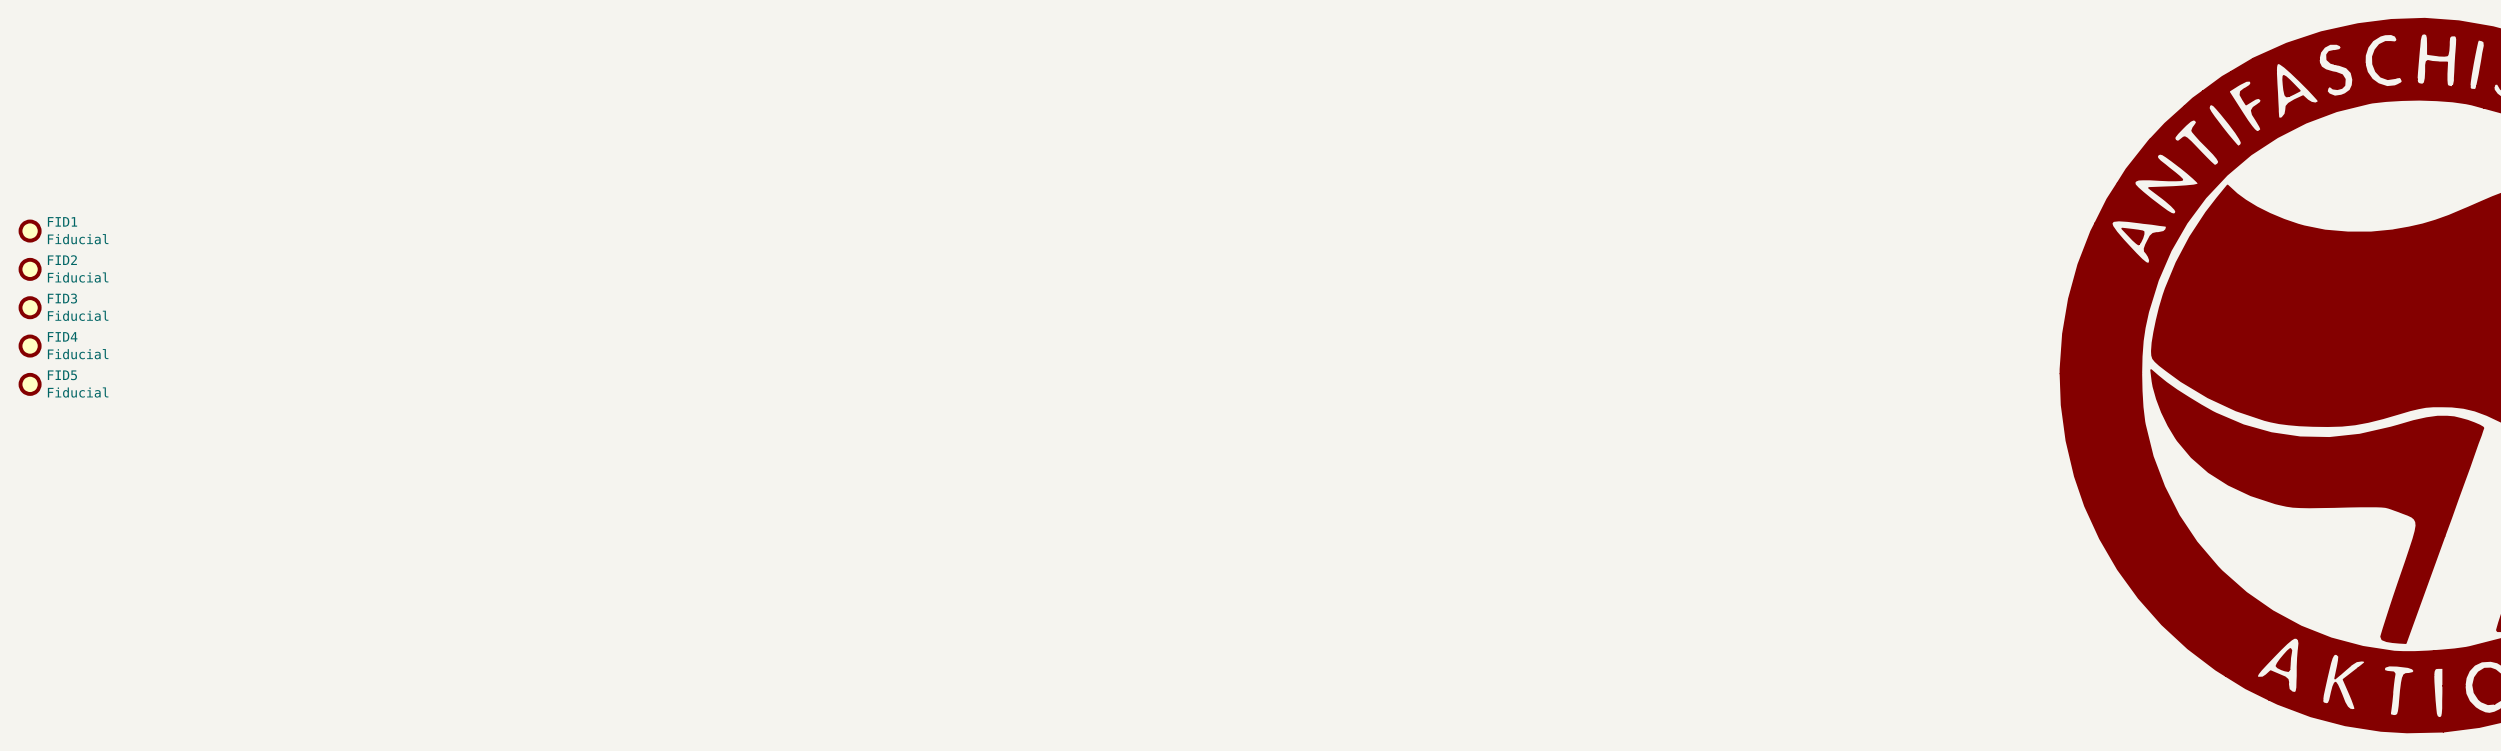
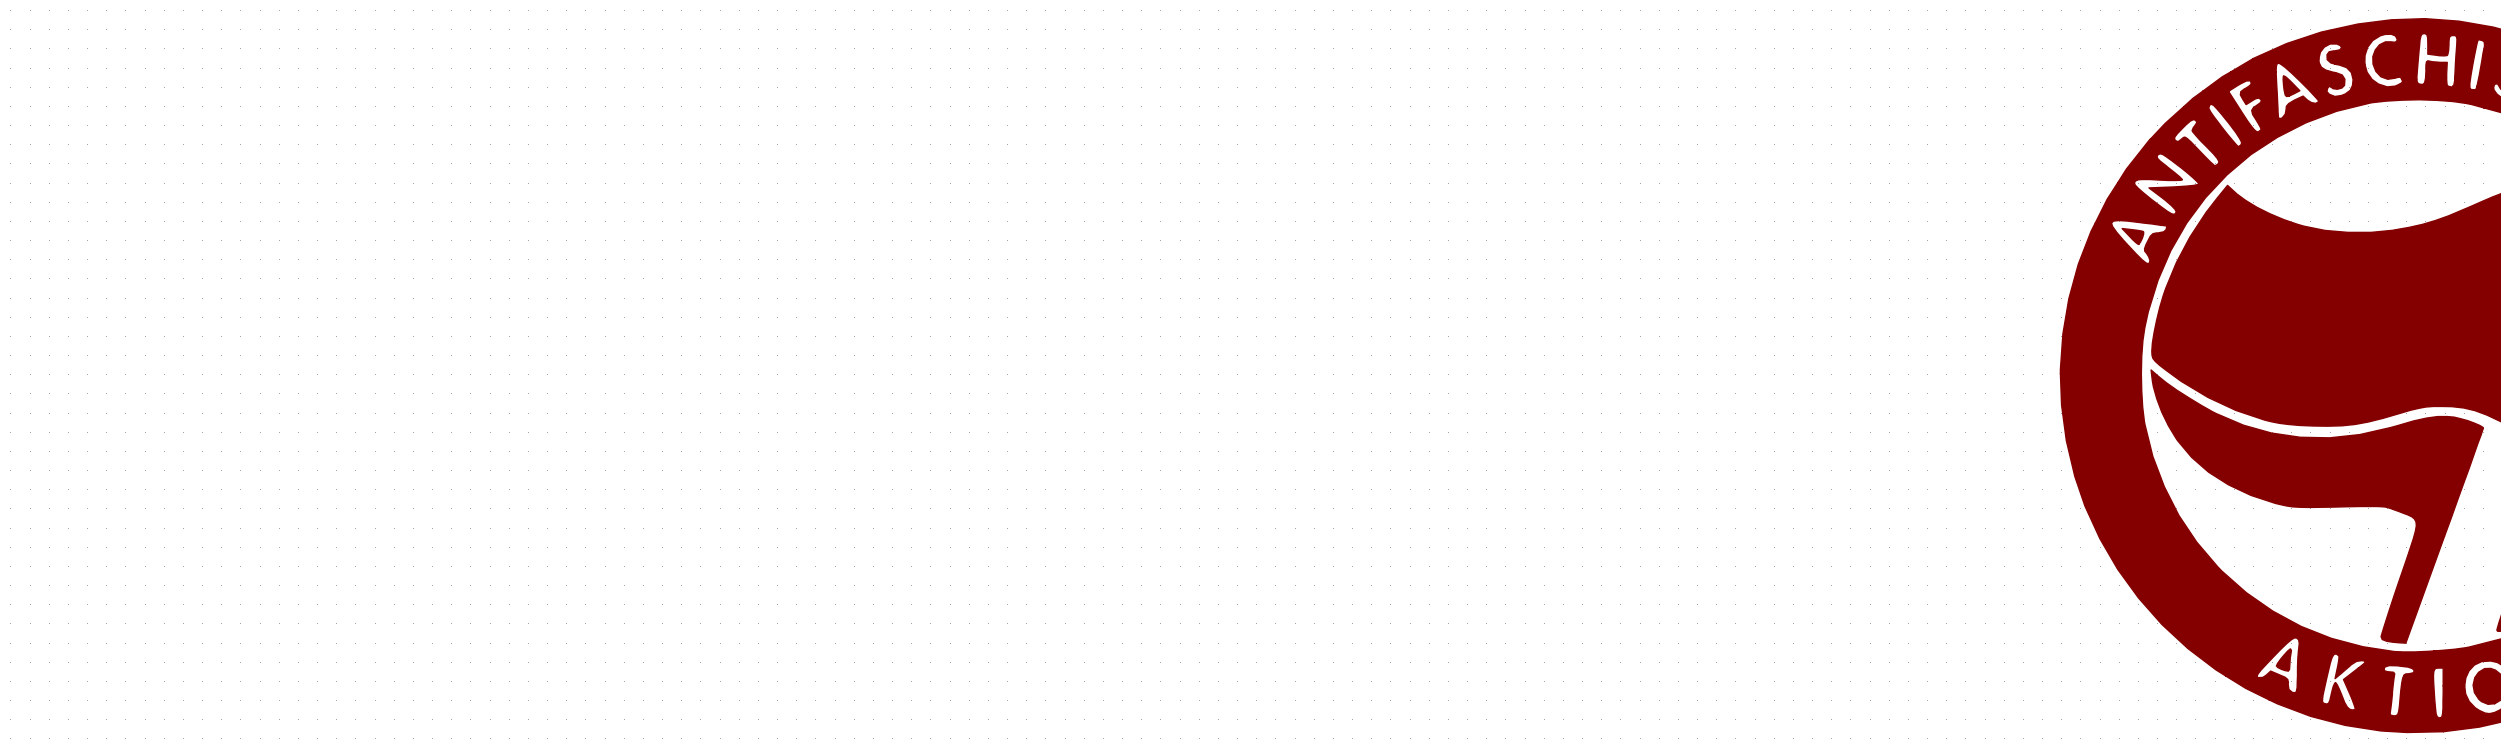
FID1: Fiducial (30, 231) -> none
FID2: Fiducial (30, 269) -> none
FID3: Fiducial (30, 307) -> none
FID4: Fiducial (30, 346) -> none
FID5: Fiducial (30, 384) -> none

